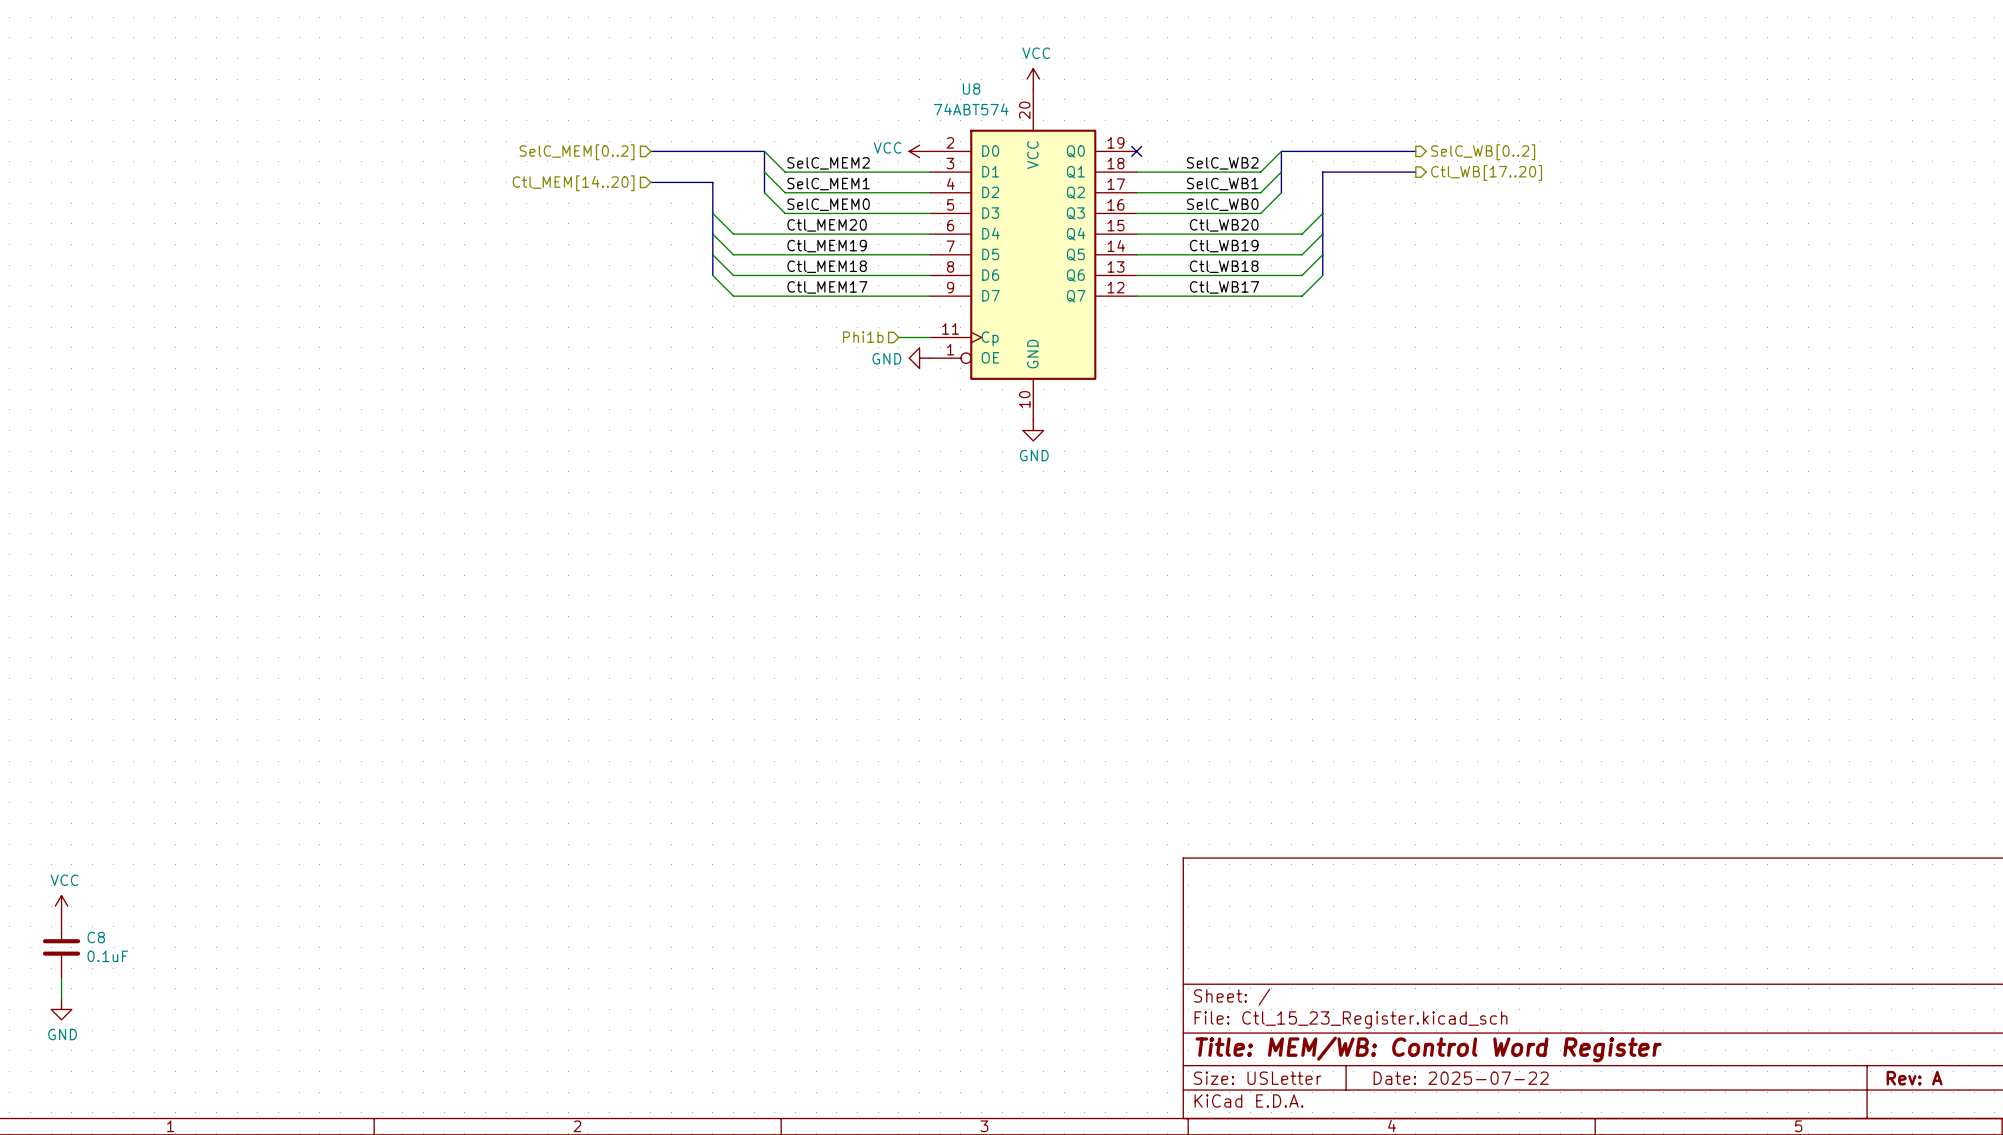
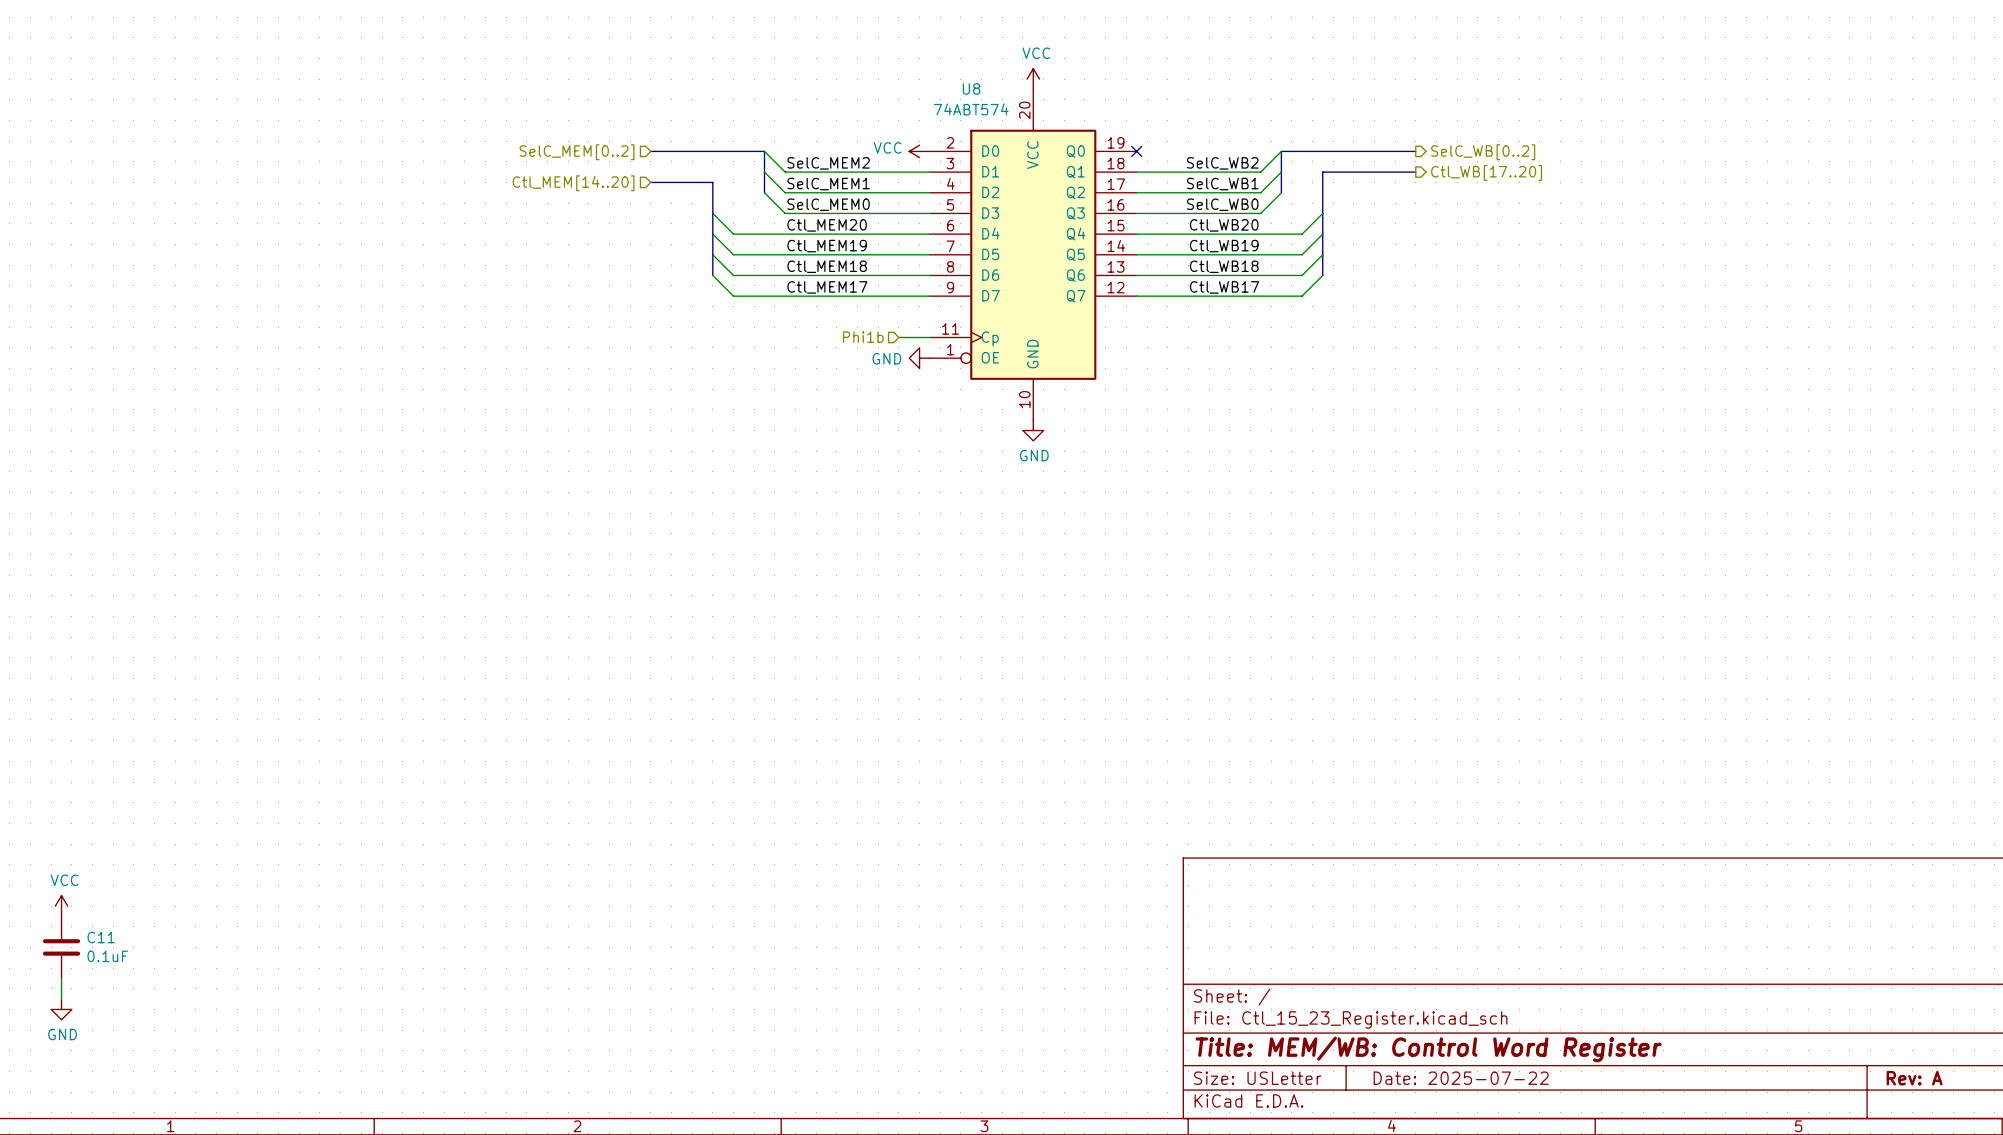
C8 name: C8 (96, 937) -> C11 (101, 937)

